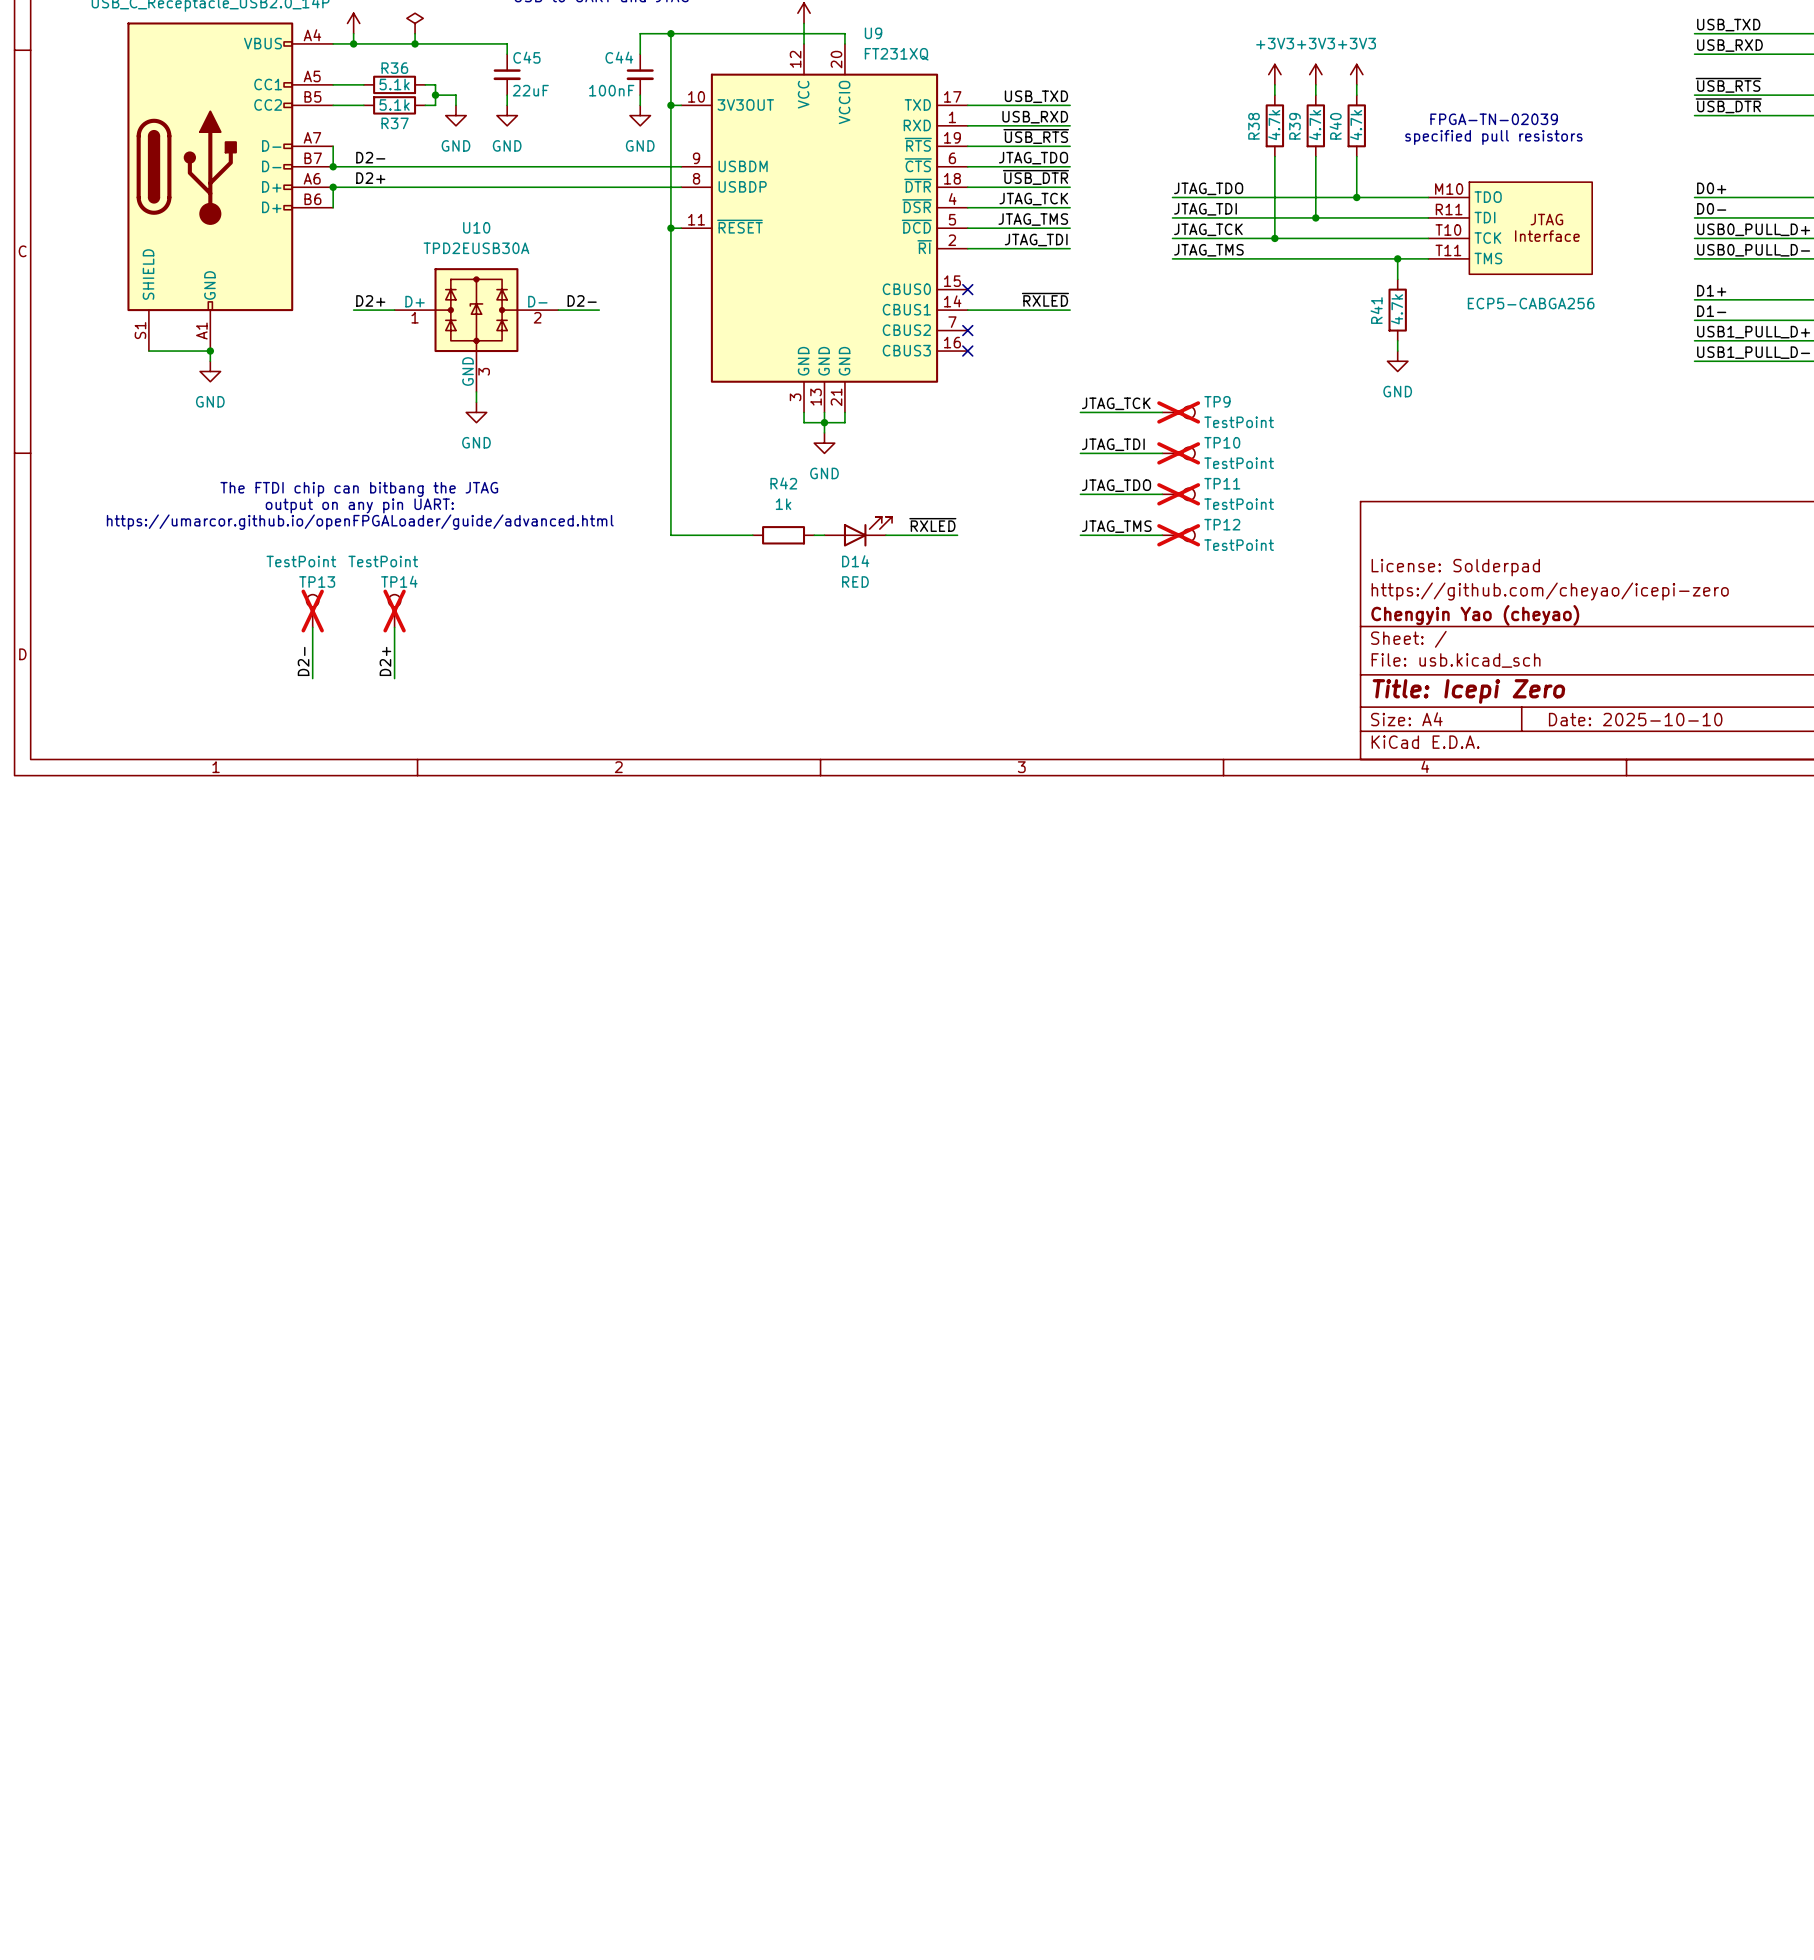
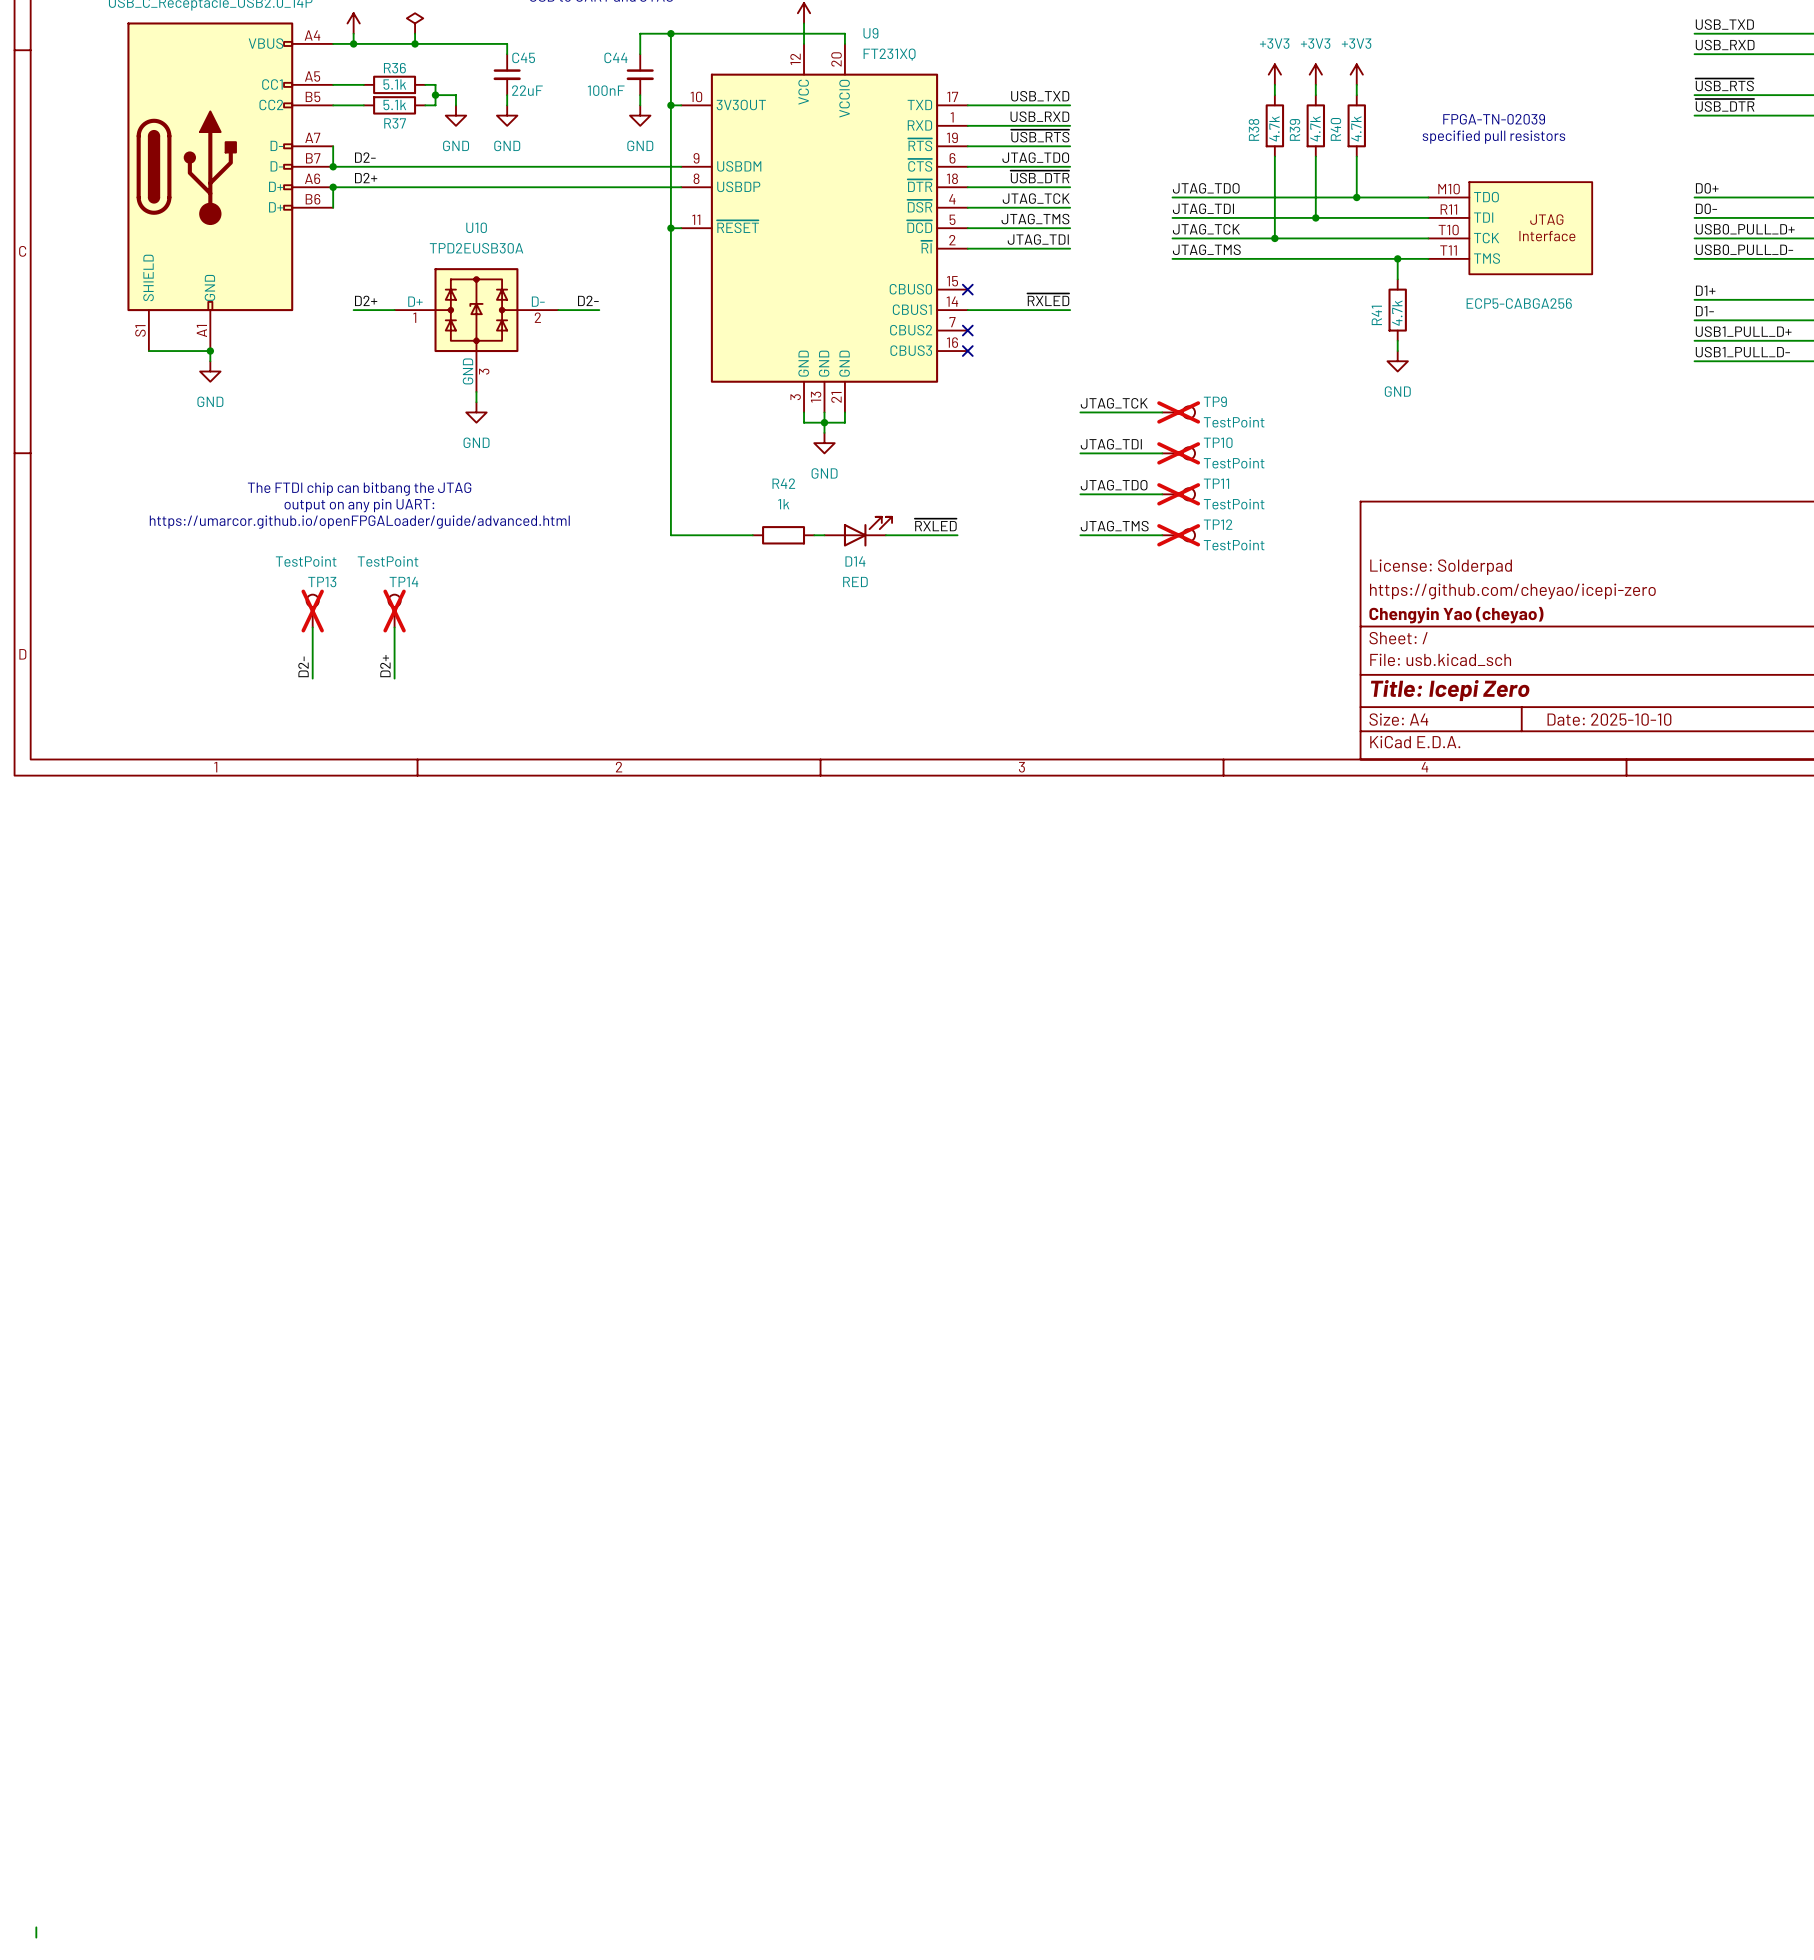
wire: none -> (36, 1927) (36, 1937)

